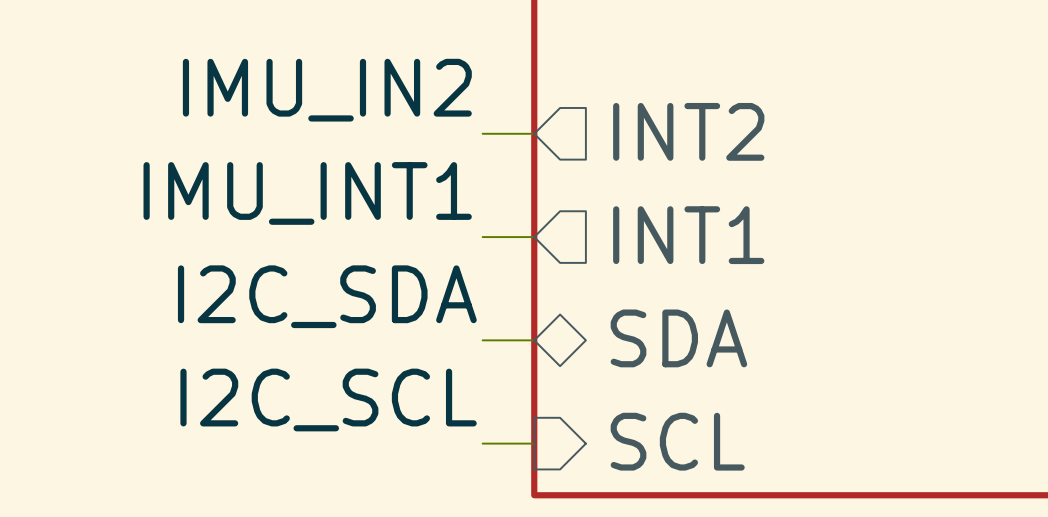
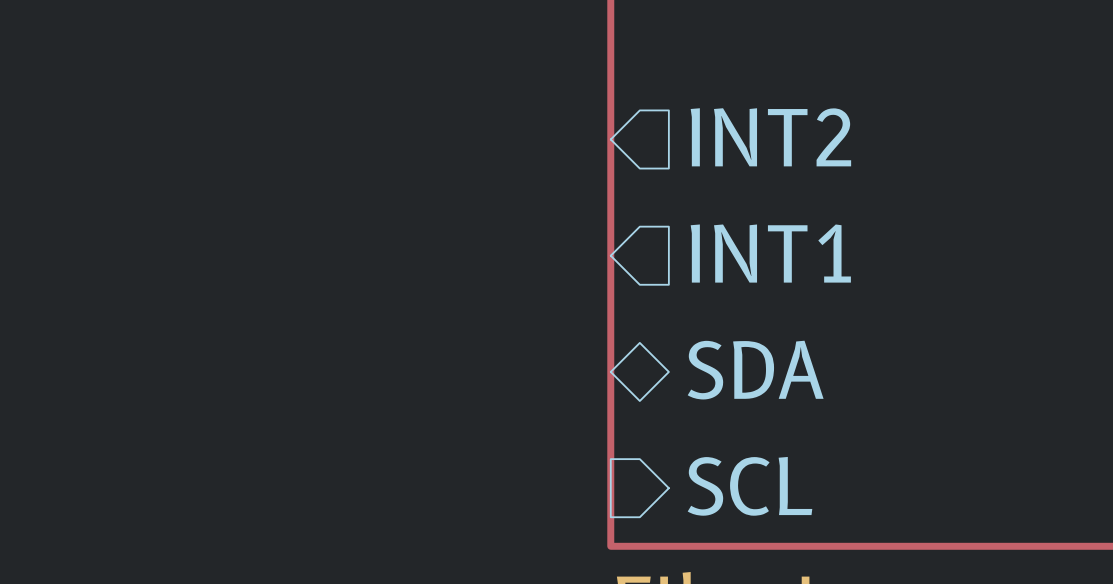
label: IMU_IN2 (327, 90) -> none
wire: (482, 133) (534, 133) -> none
label: IMU_INT1 (307, 193) -> none
wire: (482, 237) (534, 237) -> none
label: I2C_SDA (327, 296) -> none
wire: (482, 340) (534, 340) -> none
label: I2C_SCL (328, 400) -> none
wire: (482, 443) (534, 443) -> none

